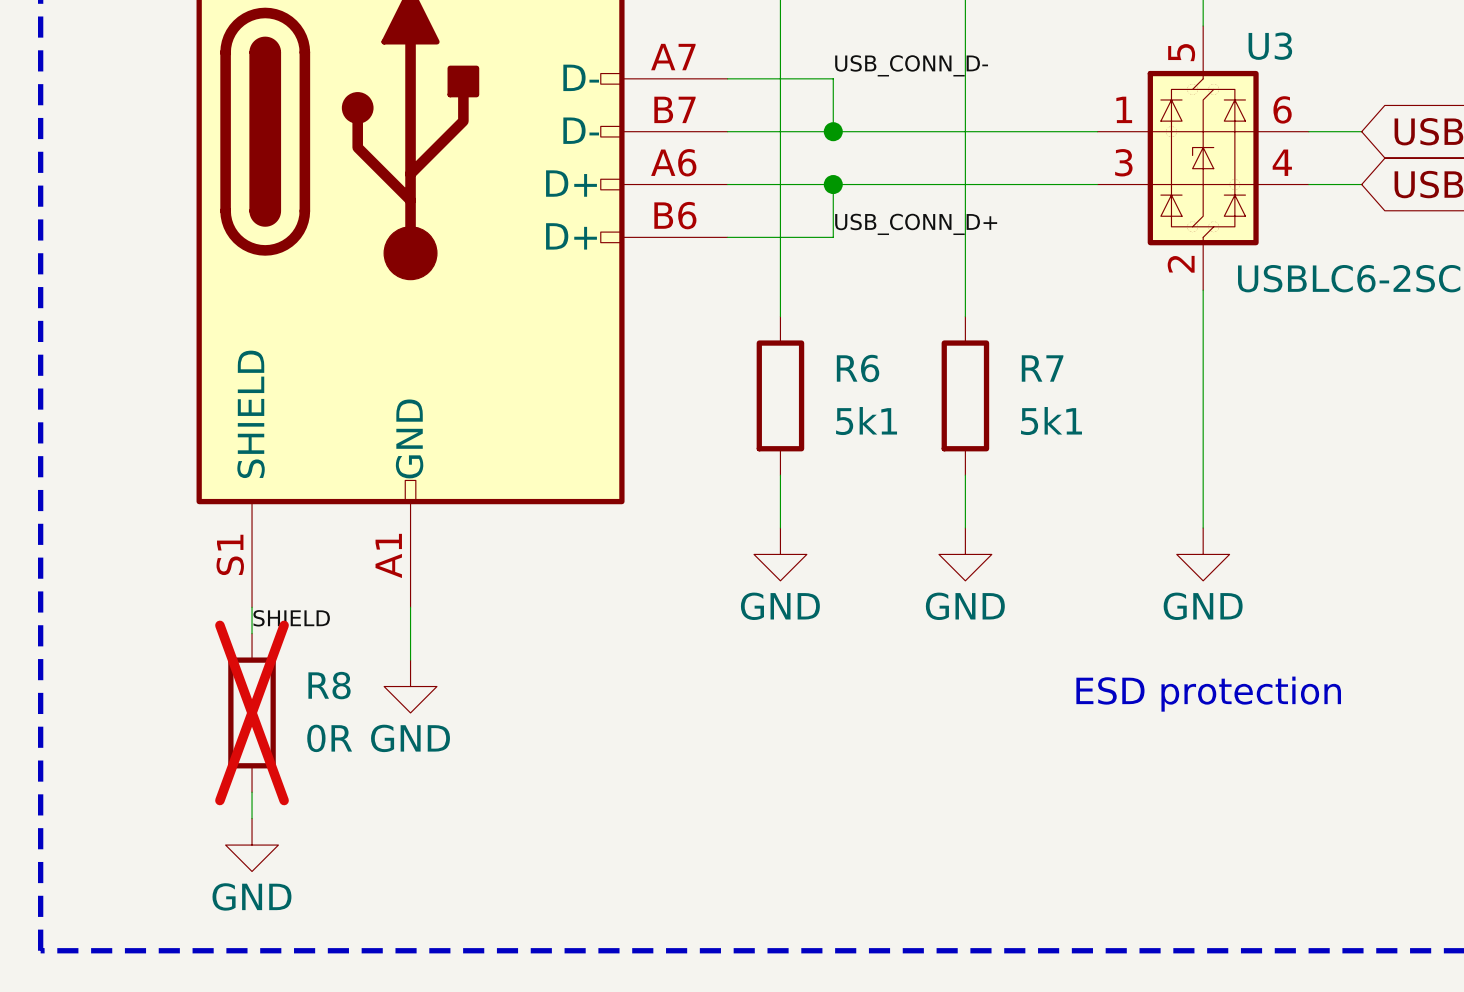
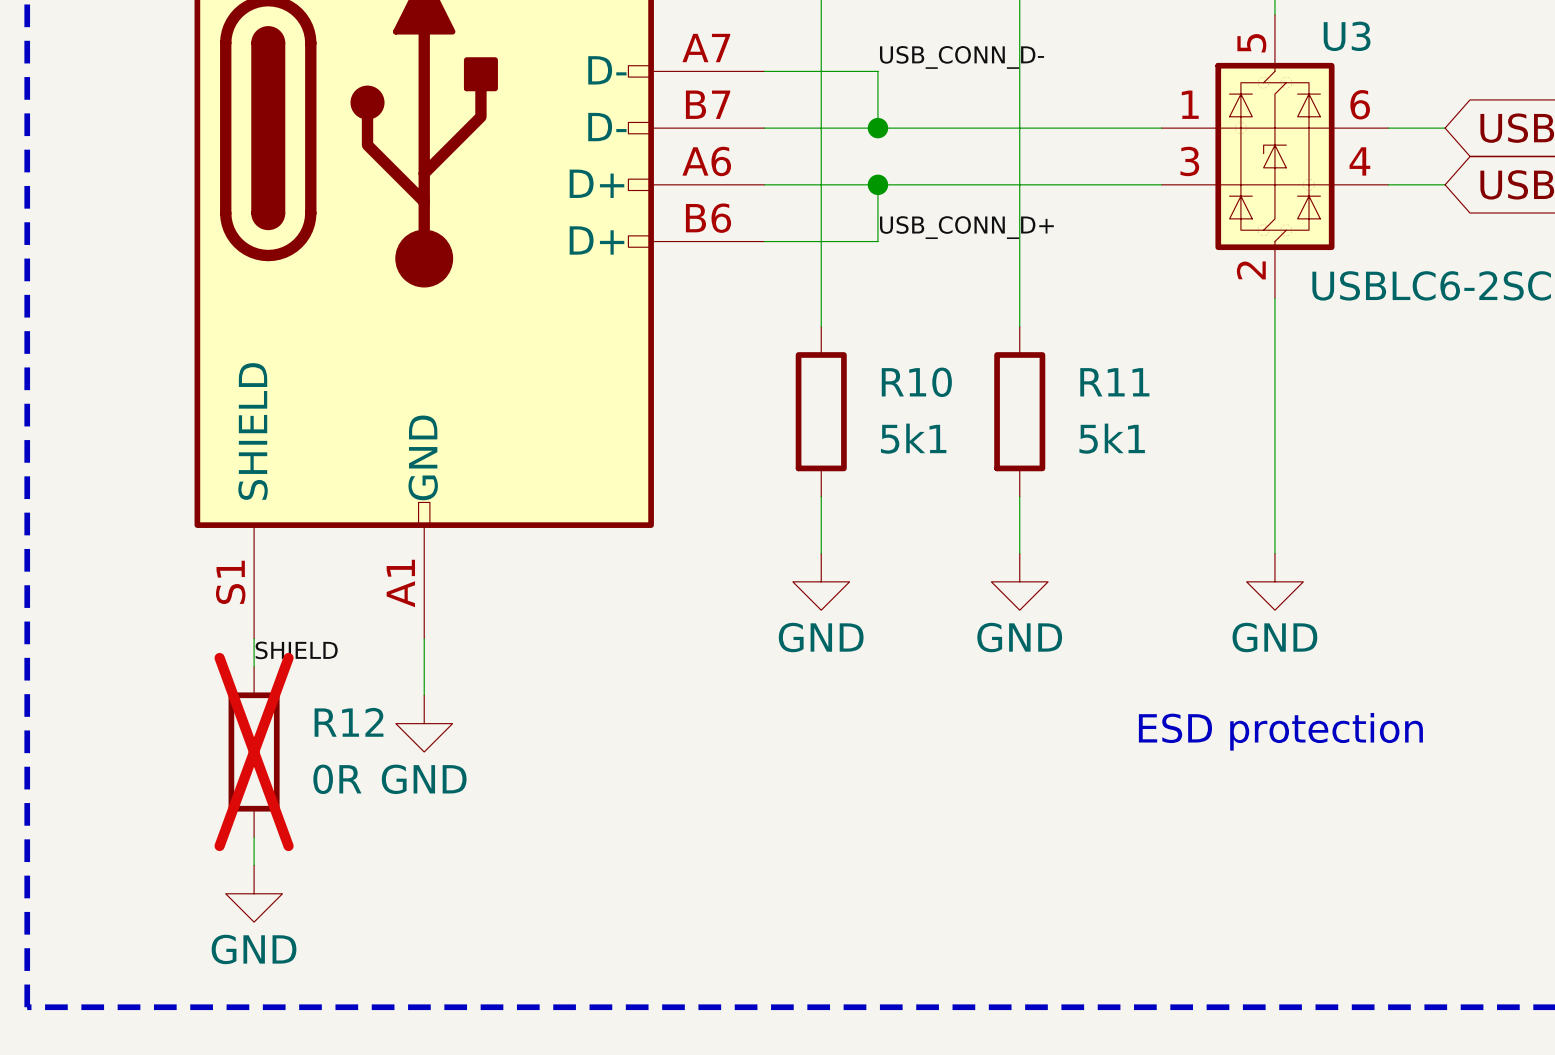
R6 name: R6 (858, 368) -> R10 (916, 382)
R7 name: R7 (1042, 368) -> R11 (1114, 382)
R8 name: R8 (329, 685) -> R12 (349, 722)

